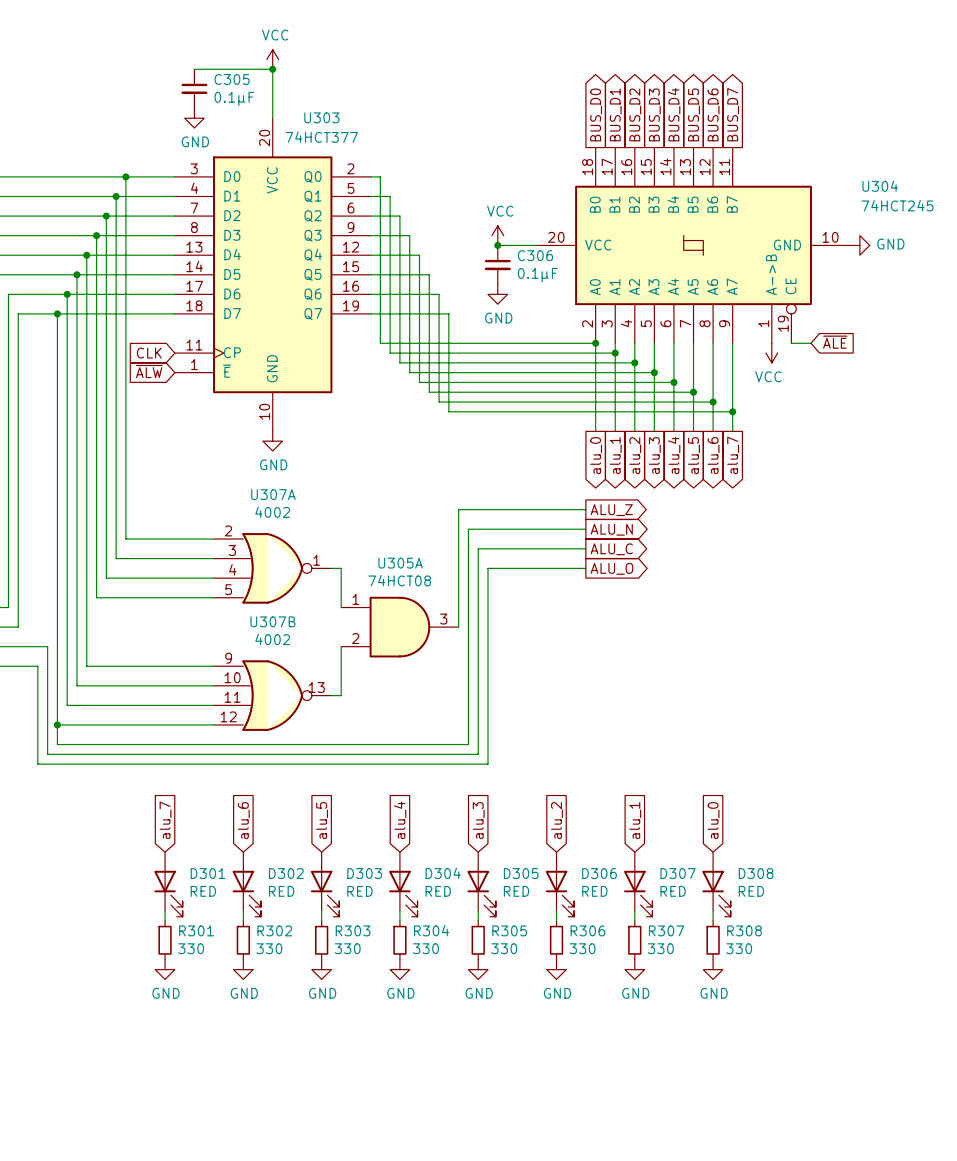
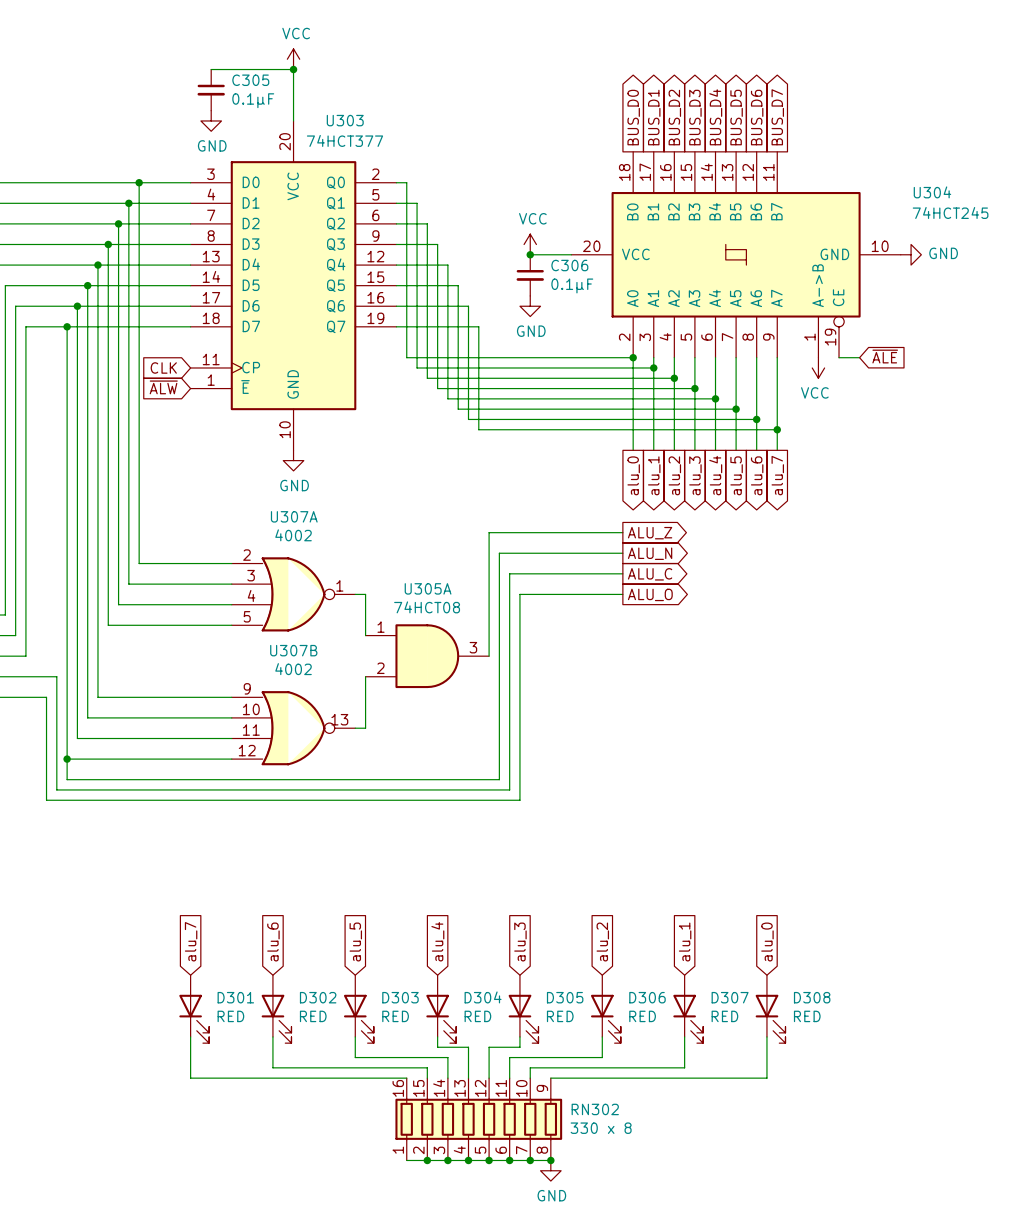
global label position: alu_7 (165, 820) -> alu_7 (191, 941)
global label position: alu_6 (243, 820) -> alu_6 (273, 942)
global label position: alu_5 (322, 820) -> alu_5 (355, 942)
global label position: alu_4 (400, 820) -> alu_4 (437, 941)
global label position: alu_3 (478, 820) -> alu_3 (520, 942)
global label position: alu_2 (556, 820) -> alu_2 (602, 942)
global label position: alu_1 (635, 820) -> alu_1 (685, 942)
global label position: alu_0 (713, 820) -> alu_0 (767, 942)
D301 position: (168, 884) -> (194, 1009)
D302 position: (246, 884) -> (276, 1009)
D303 position: (325, 884) -> (358, 1009)
D304 position: (403, 884) -> (441, 1009)
D305 position: (481, 884) -> (523, 1009)
D306 position: (559, 884) -> (605, 1009)
D307 position: (638, 884) -> (688, 1009)
D308 position: (716, 884) -> (770, 1009)
R301: 330 (165, 940) -> none
R302: 330 (243, 940) -> none
R303: 330 (321, 940) -> none
R304: 330 (399, 940) -> none
R305: 330 (478, 940) -> none
R306: 330 (556, 940) -> none
R307: 330 (634, 940) -> none
R308: 330 (713, 940) -> none
power symbol: GND (165, 969) -> none
power symbol: GND (243, 969) -> none
power symbol: GND (321, 969) -> none
power symbol: GND (399, 969) -> none
power symbol: GND (478, 969) -> none
power symbol: GND (556, 969) -> none
power symbol: GND (634, 969) -> none
power symbol: GND (713, 969) -> none
wire: none -> (190, 1036) (190, 1078) (406, 1078)
wire: none -> (272, 1036) (272, 1067) (427, 1067) (427, 1078)
wire: none -> (355, 1036) (355, 1057) (447, 1057) (447, 1078)
wire: none -> (437, 1036) (437, 1047) (468, 1047) (468, 1078)
wire: none -> (519, 1036) (519, 1047) (489, 1047) (489, 1078)
wire: none -> (602, 1036) (602, 1057) (509, 1057) (509, 1078)
wire: none -> (684, 1036) (684, 1067) (530, 1067) (530, 1078)
wire: none -> (766, 1036) (766, 1078) (550, 1078)
RN302: none -> 330 x 8 (478, 1119)
wire: none -> (406, 1160) (550, 1160)
junction: none -> (427, 1160)
junction: none -> (447, 1160)
junction: none -> (468, 1160)
junction: none -> (489, 1160)
junction: none -> (509, 1160)
junction: none -> (530, 1160)
junction: none -> (550, 1160)
power symbol: none -> GND (550, 1170)

